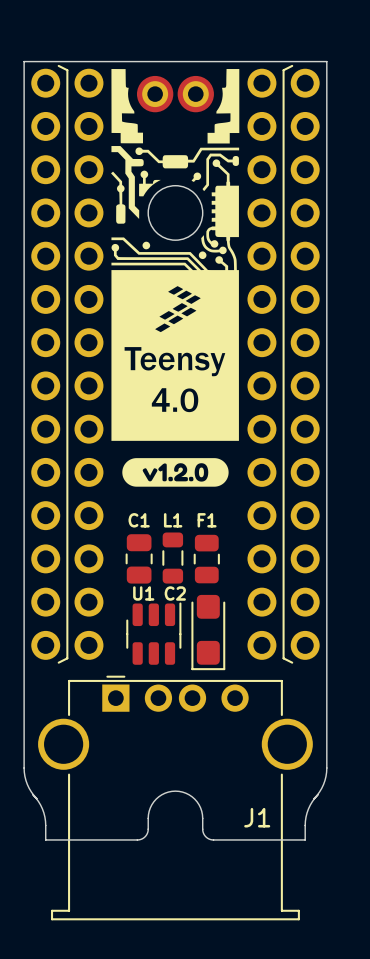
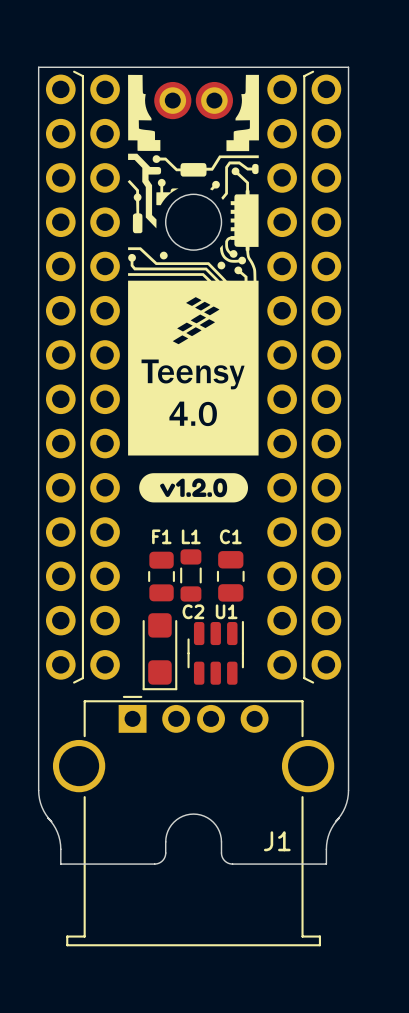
C1 position: (139, 558) -> (230, 576)
F1 position: (206, 559) -> (161, 576)
U1 name position: U1 (143, 593) -> U1 (226, 611)
C2 position: (208, 632) -> (159, 651)
U1 position: (153, 633) -> (215, 652)

